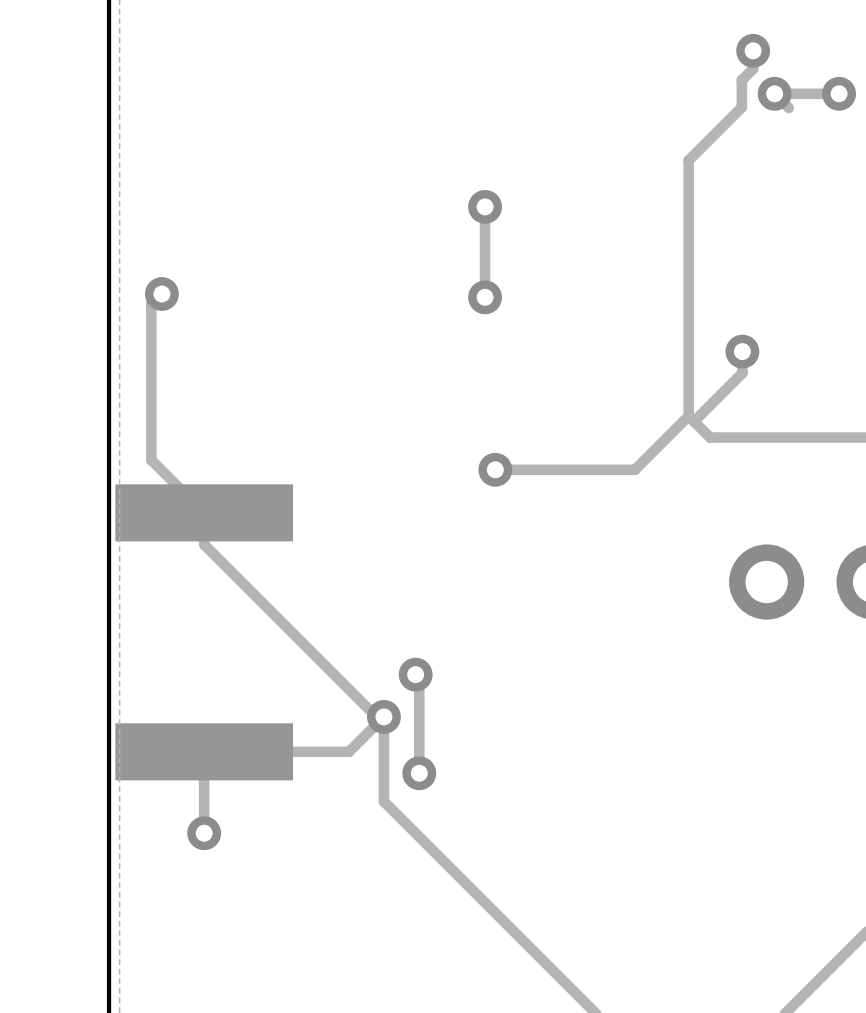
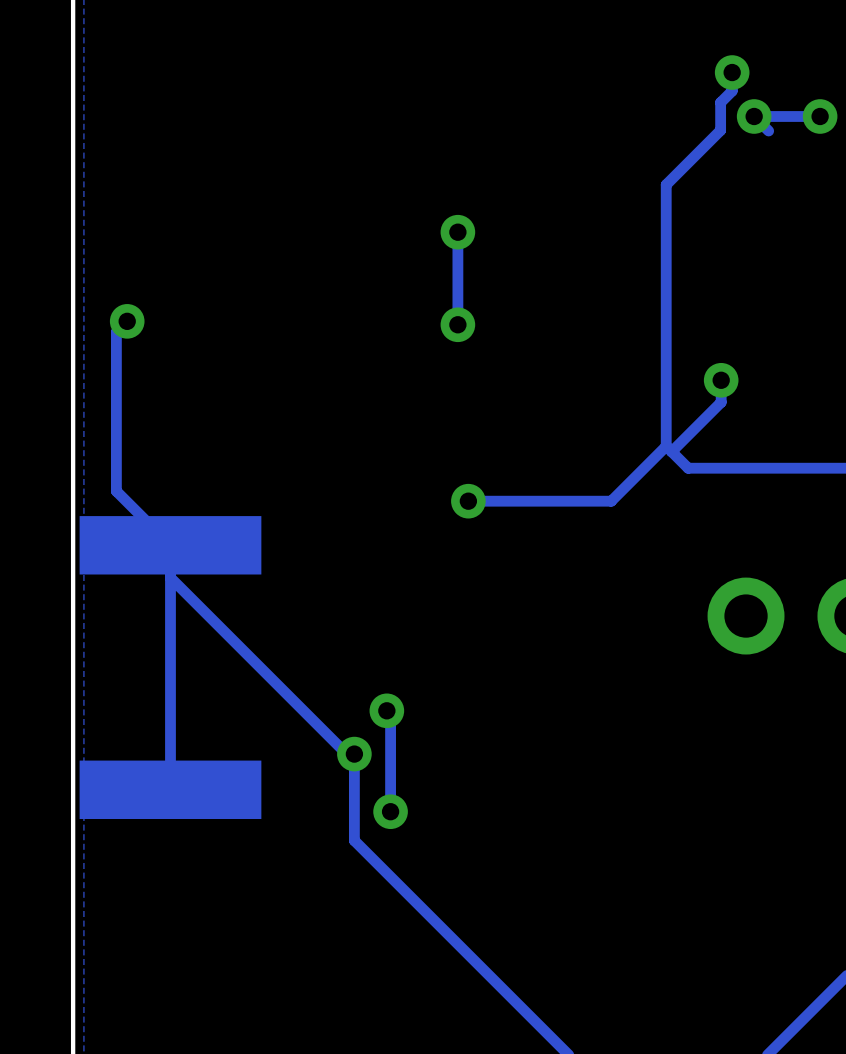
track: none -> (170, 577) (170, 789)
track: (383, 716) (349, 751) (204, 751) (204, 833) -> none
via: (204, 833) -> none

